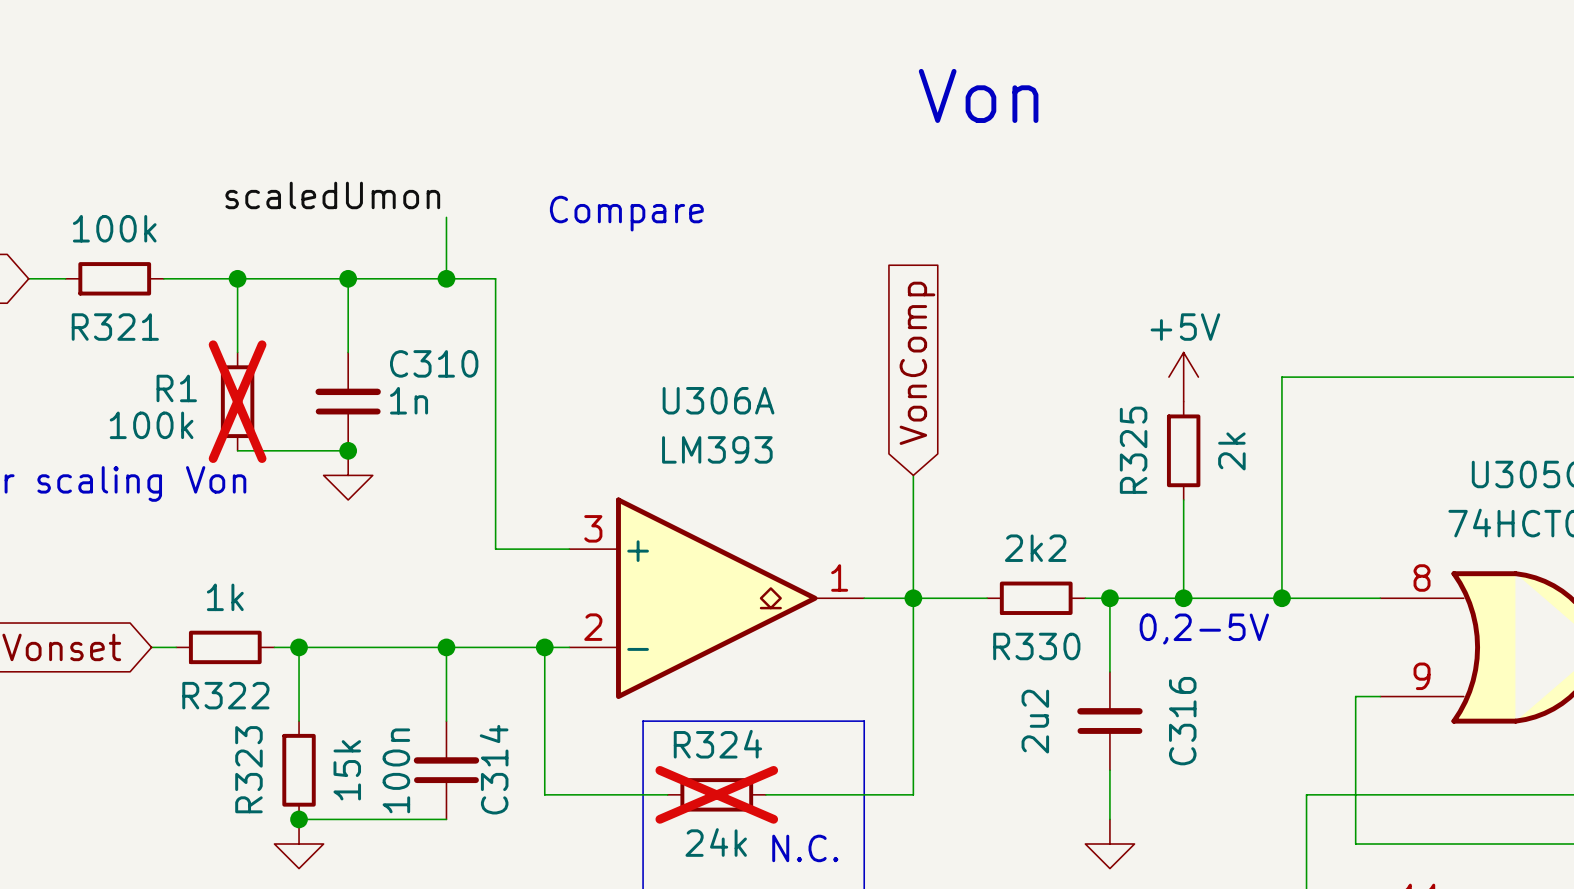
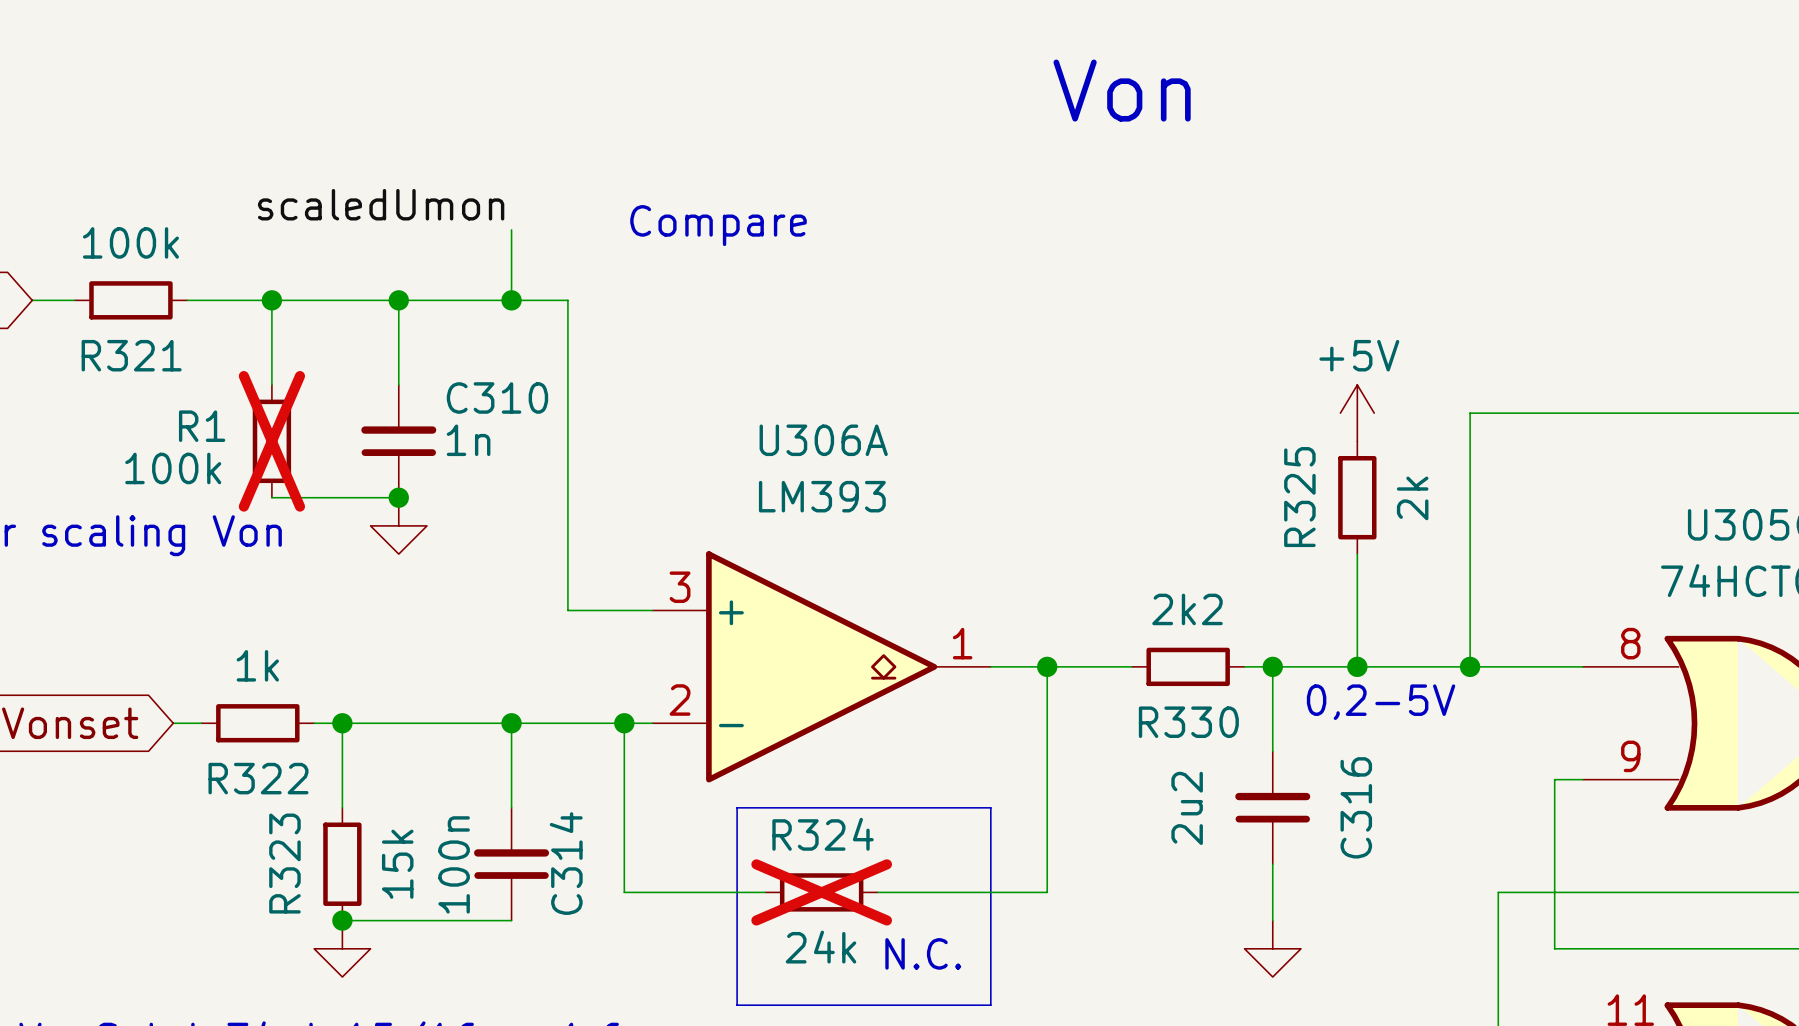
global label: VonComp (917, 363) -> none
wire: (913, 475) (913, 598) -> none

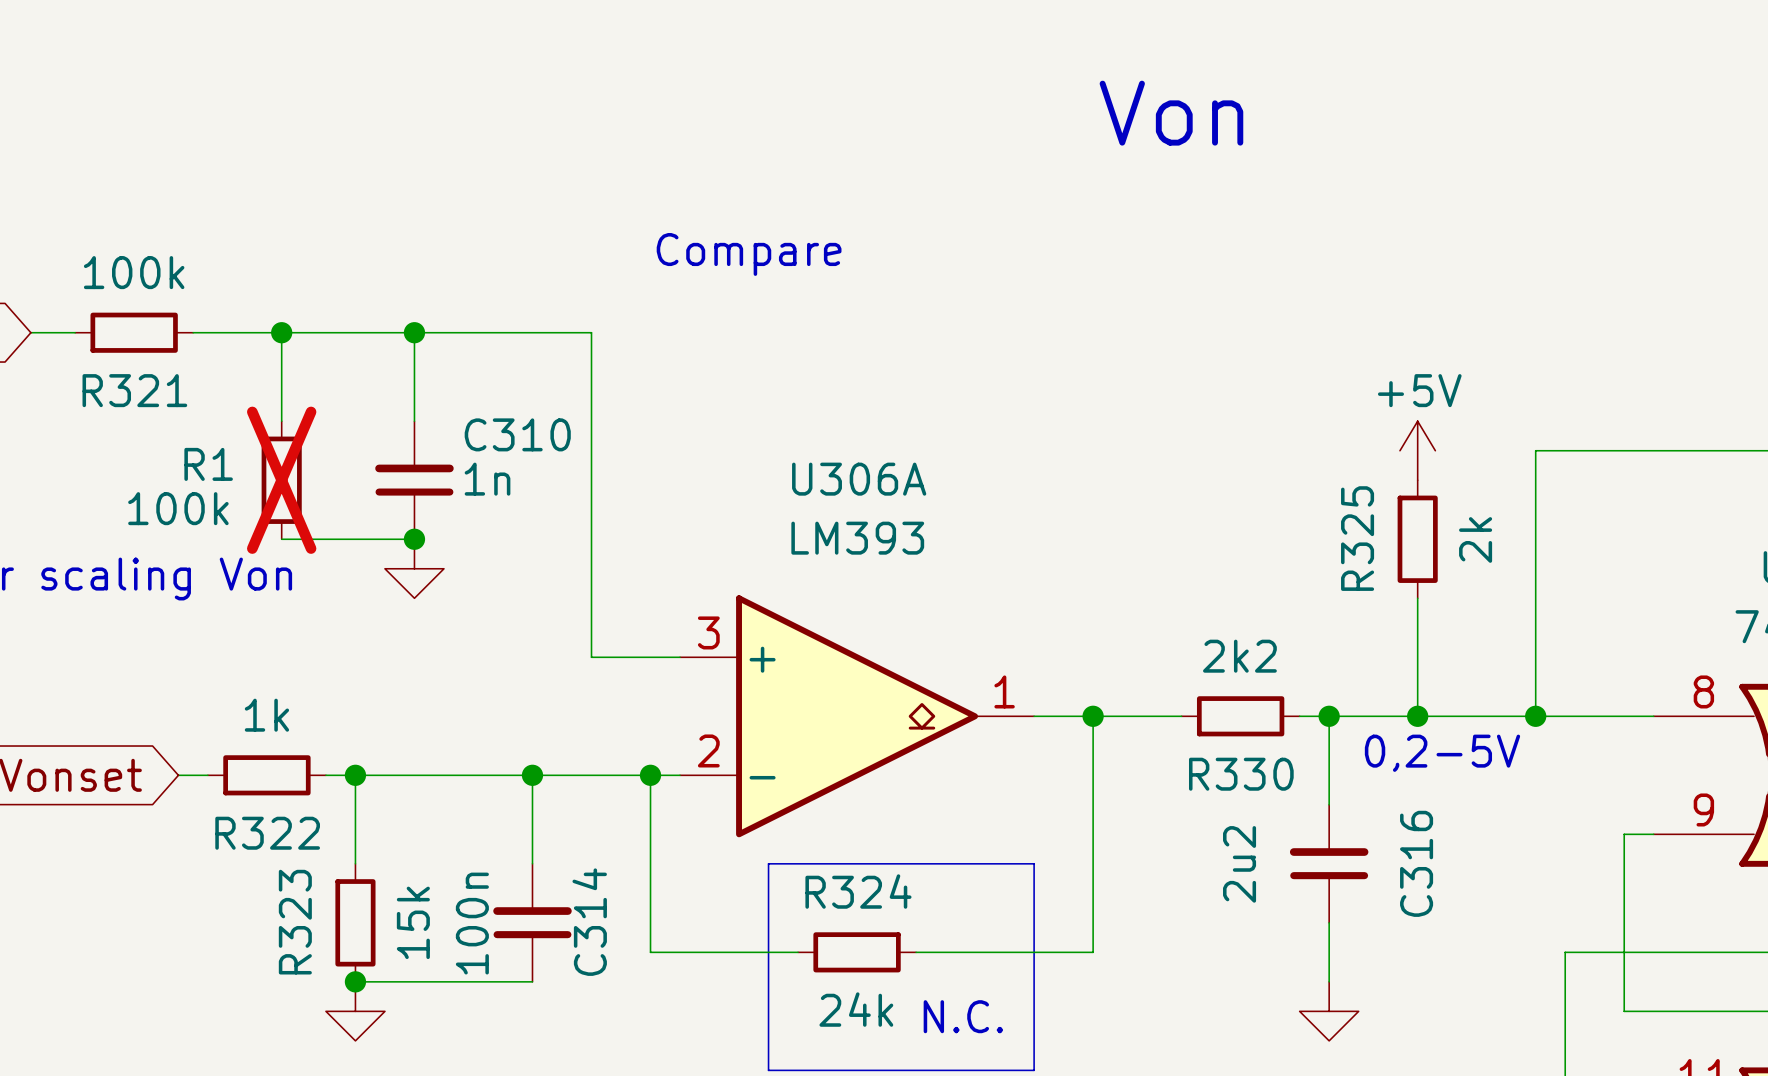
label: scaledUmon (381, 204) -> none
wire: (511, 229) (511, 300) -> none
junction: (511, 300) -> none
R324 do-not-place cross: (821, 892) -> none

